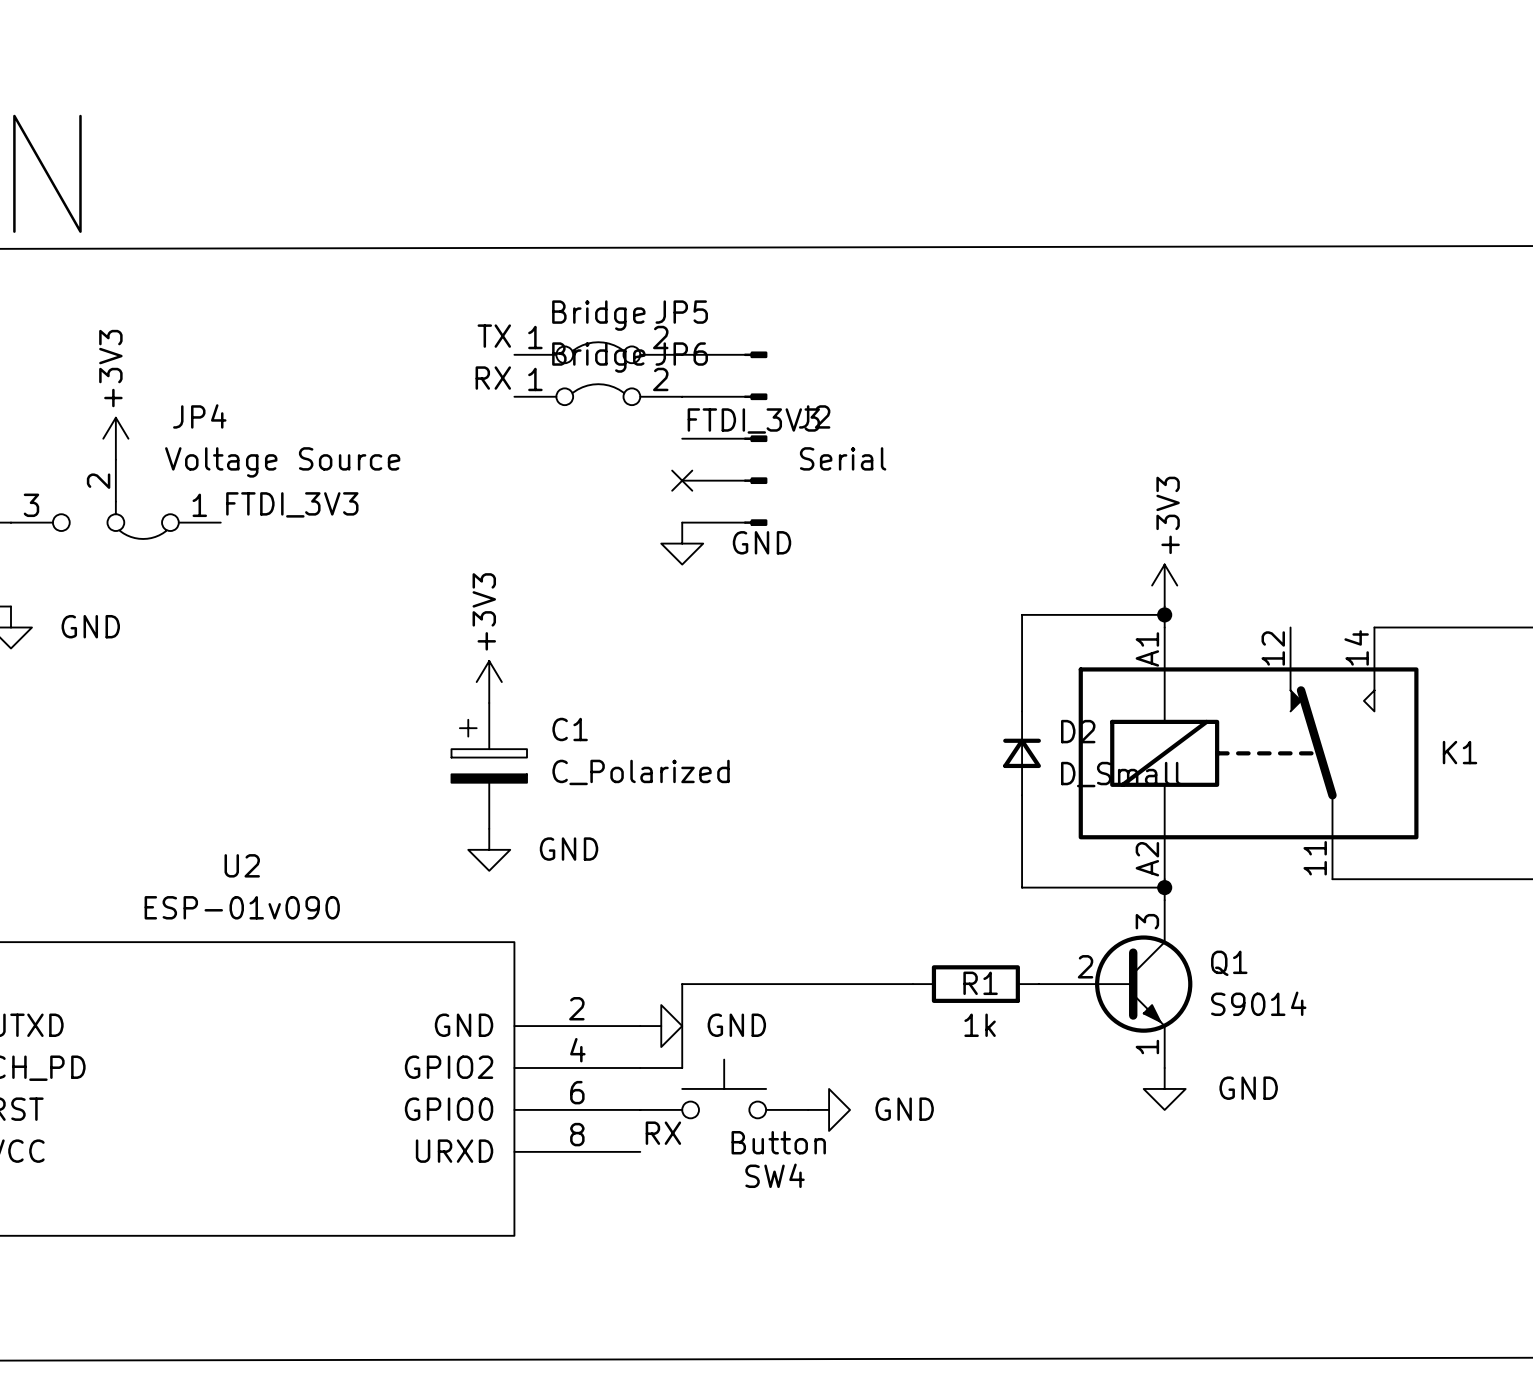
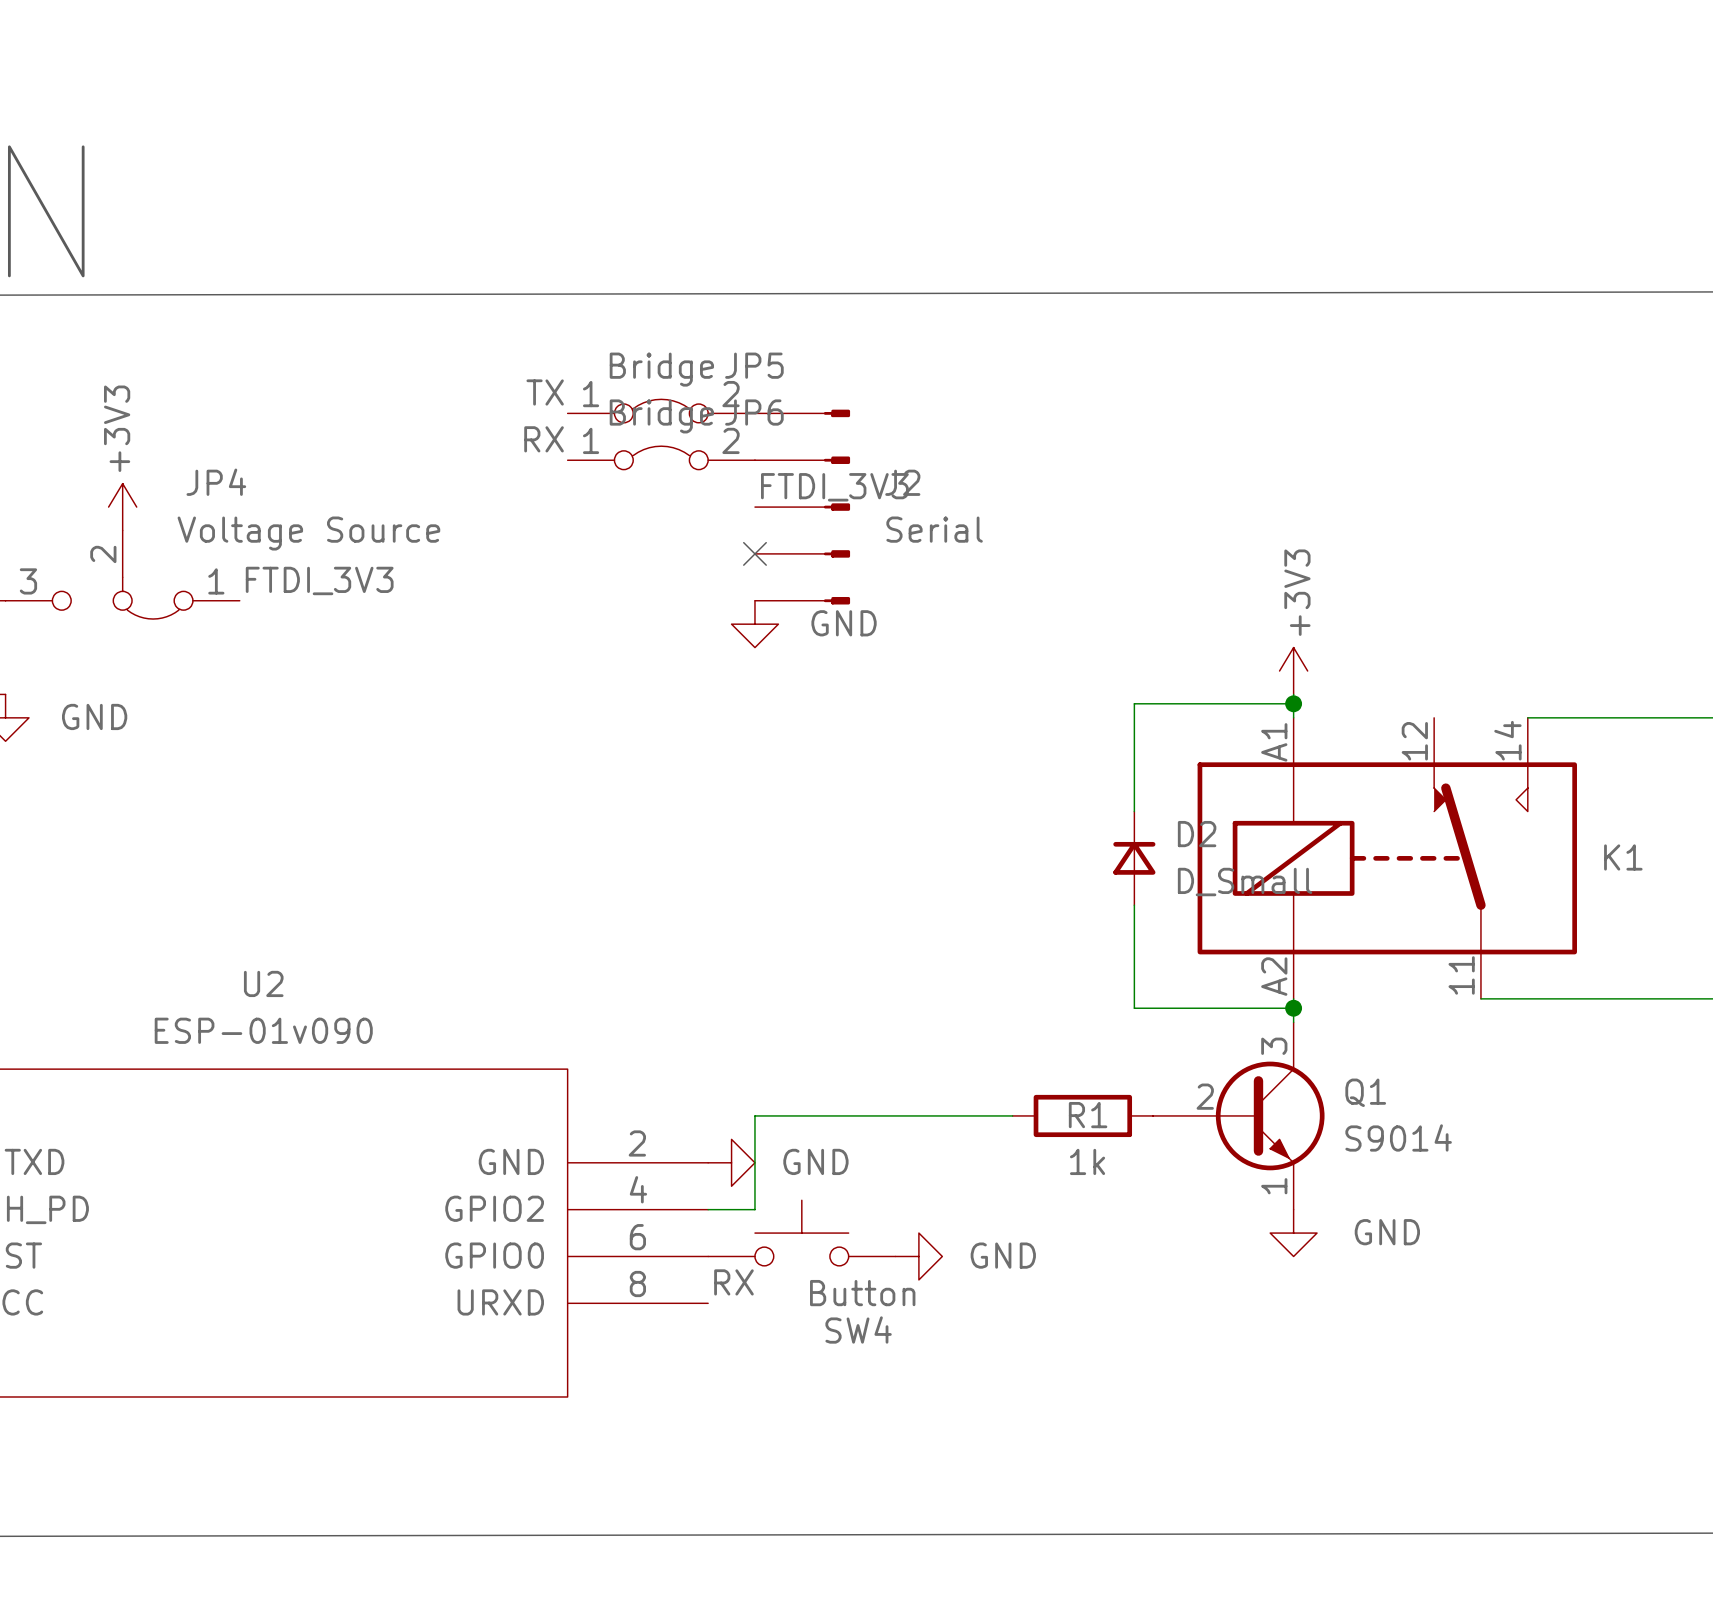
power symbol: +3V3 (489, 682) -> none
C1: C_Polarized (489, 765) -> none
power symbol: GND (489, 849) -> none

